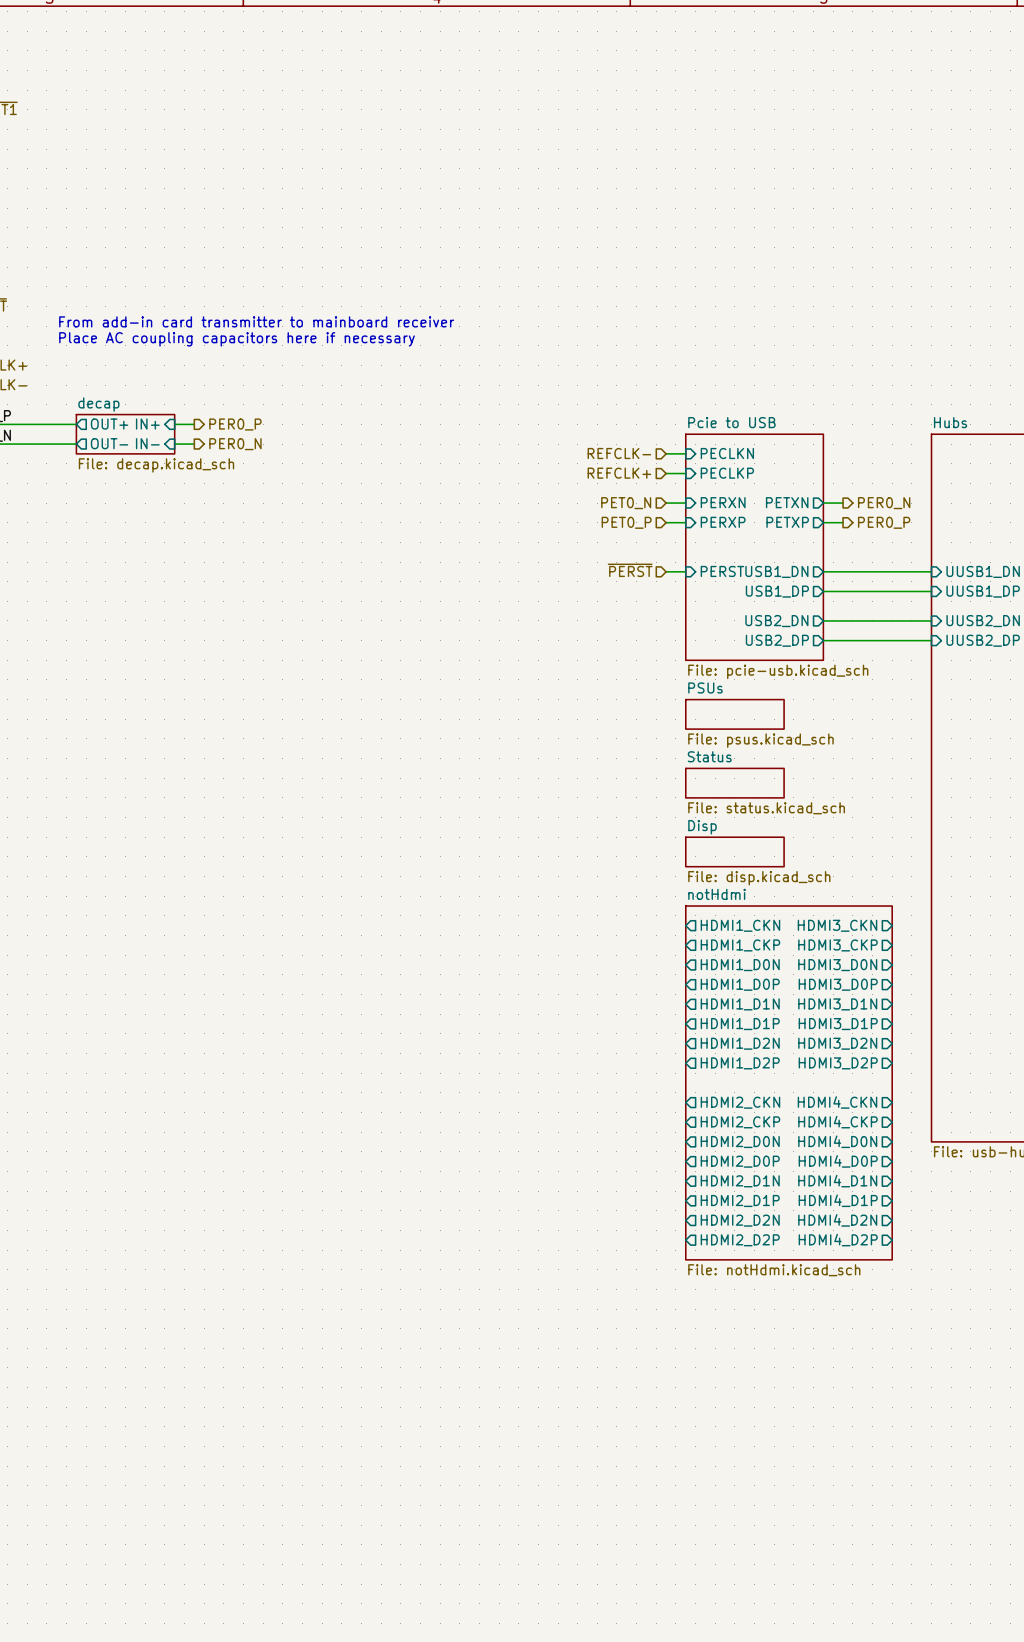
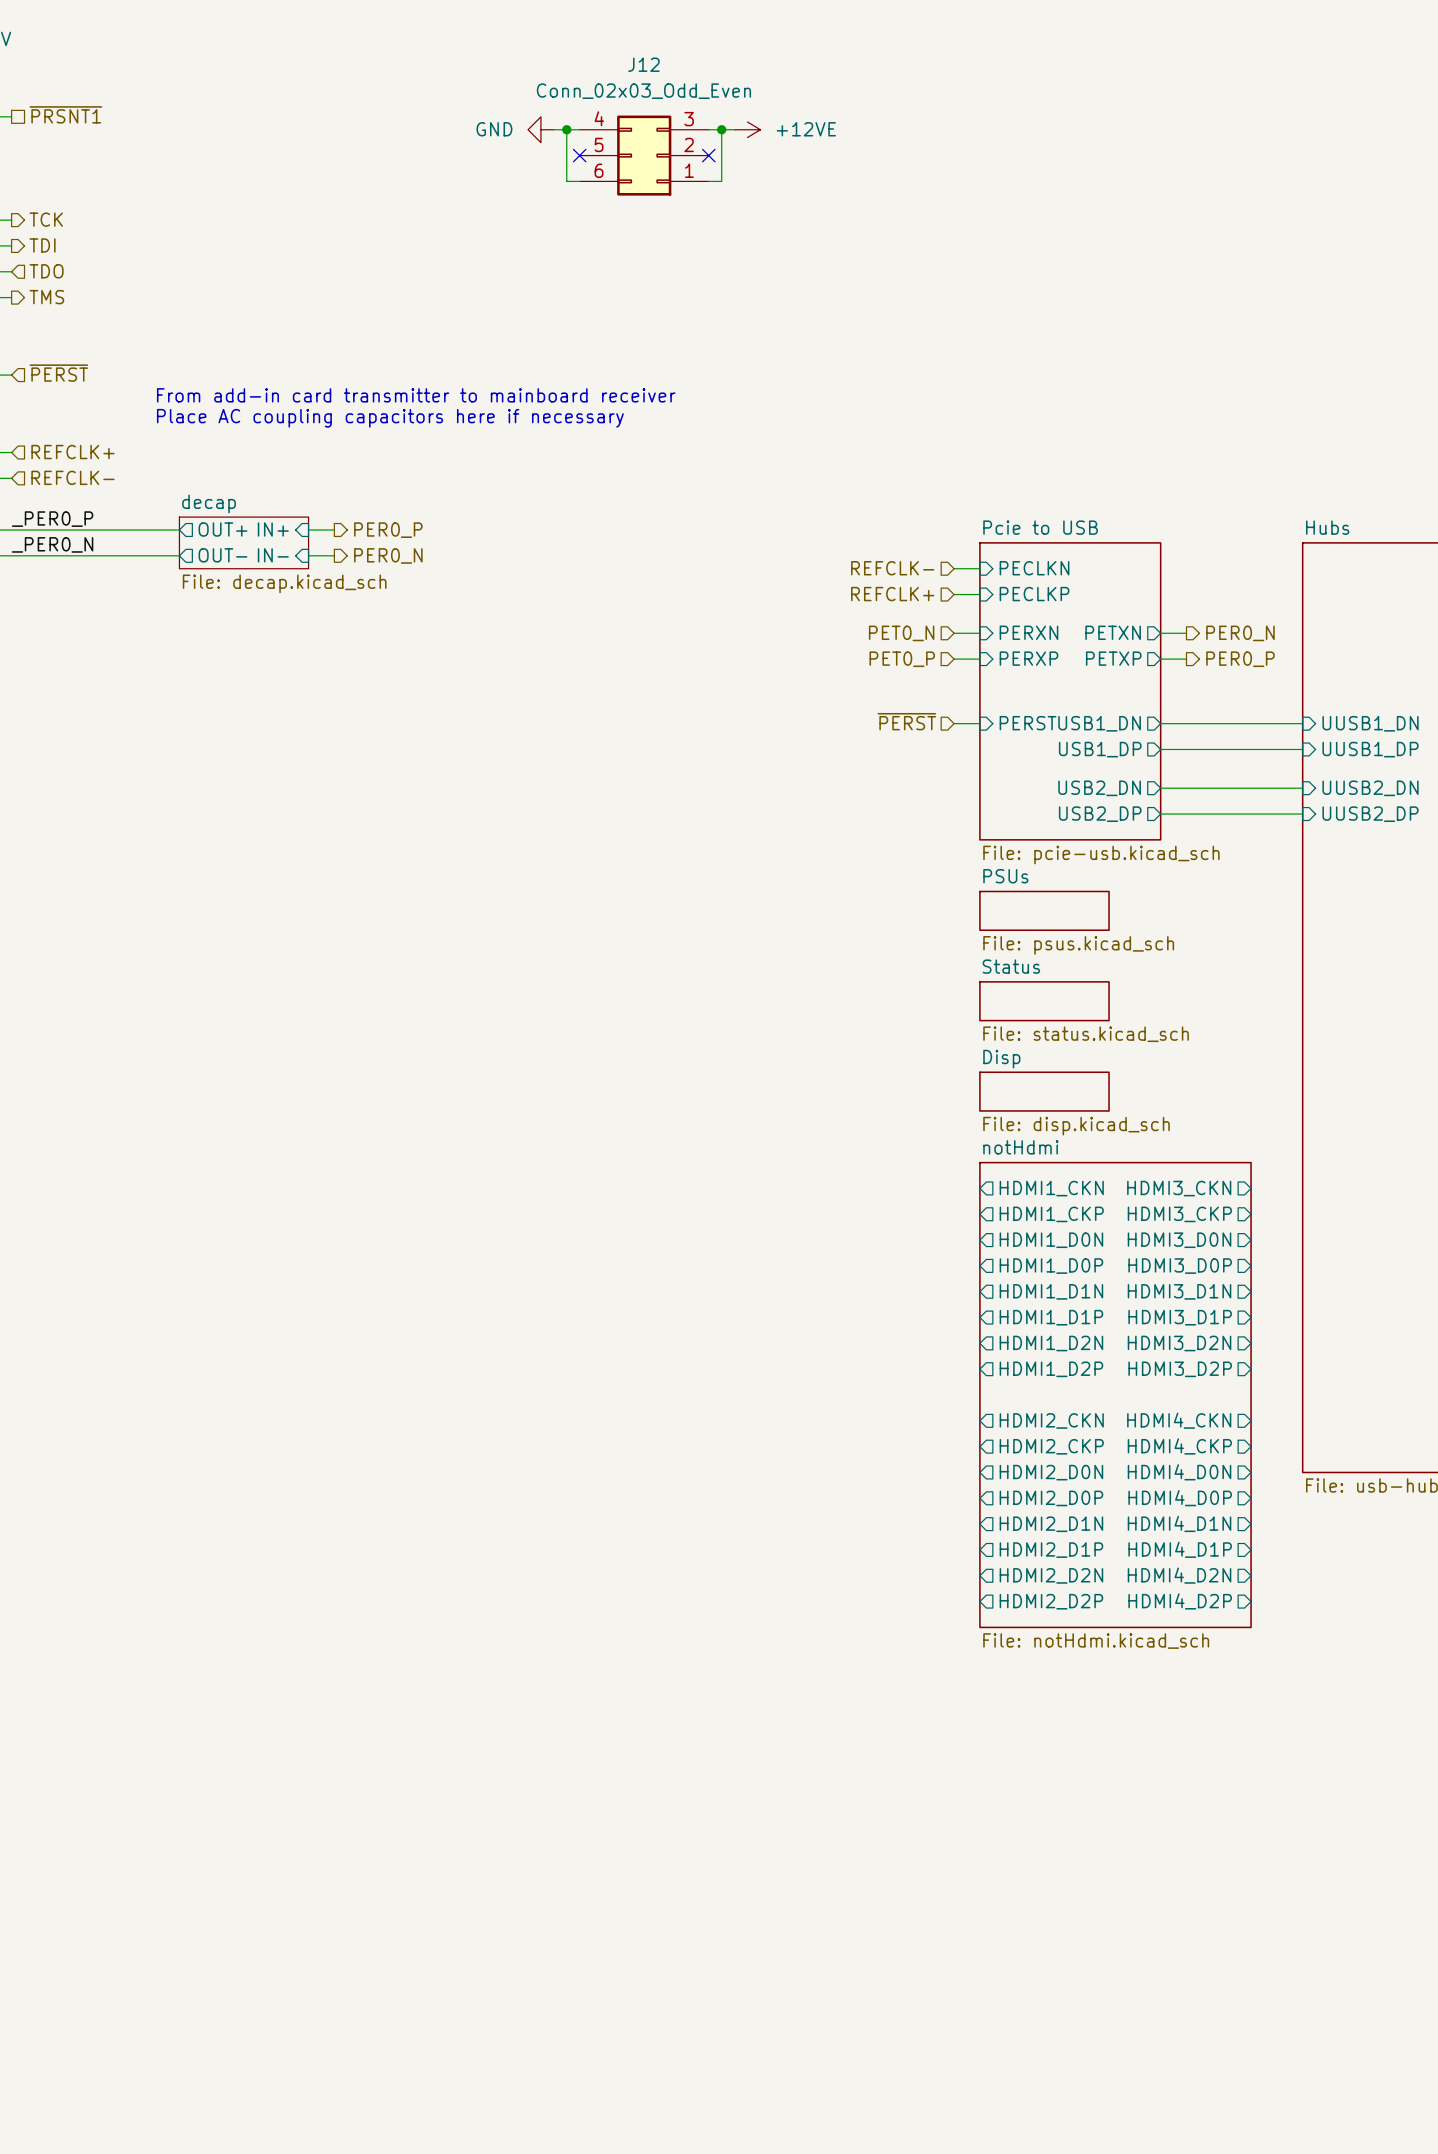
power symbol: none -> GND (540, 129)
wire: none -> (553, 129) (579, 129)
wire: none -> (566, 129) (566, 181) (579, 181)
junction: none -> (566, 129)
wire: none -> (708, 129) (734, 129)
wire: none -> (721, 129) (721, 181) (708, 181)
junction: none -> (721, 129)
power symbol: none -> +12VE (747, 129)
no-connect mark: none -> (579, 155)
J12: none -> Conn_02x03_Odd_Even (644, 155)
no-connect mark: none -> (708, 155)

